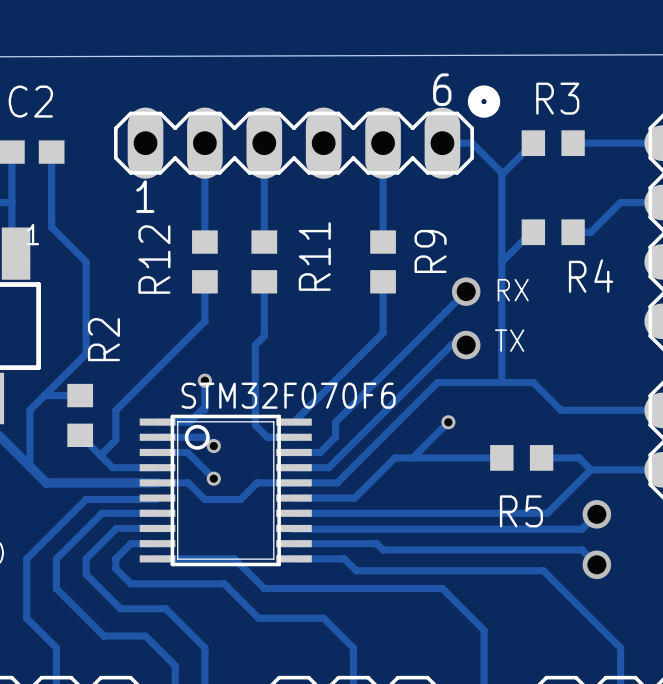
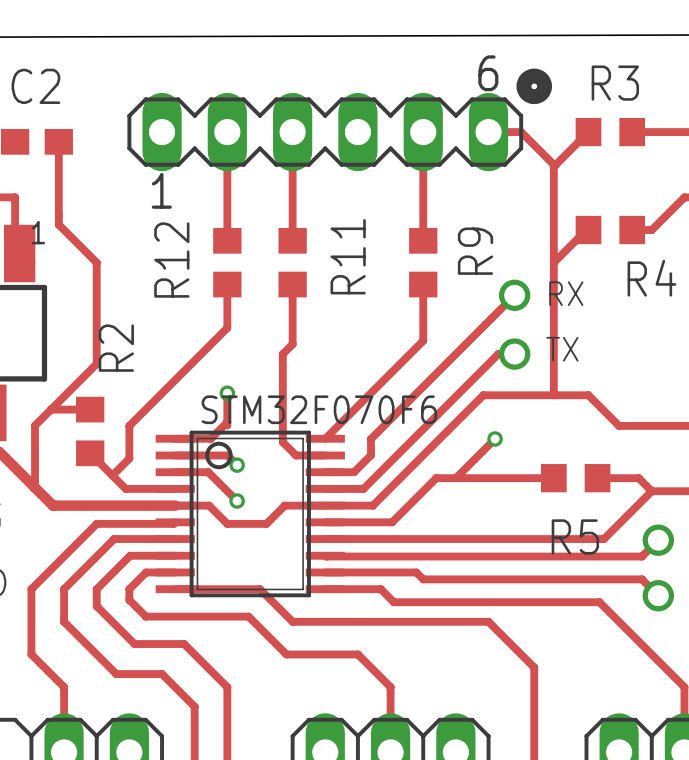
track: (11, 152) (11, 202) -> none

